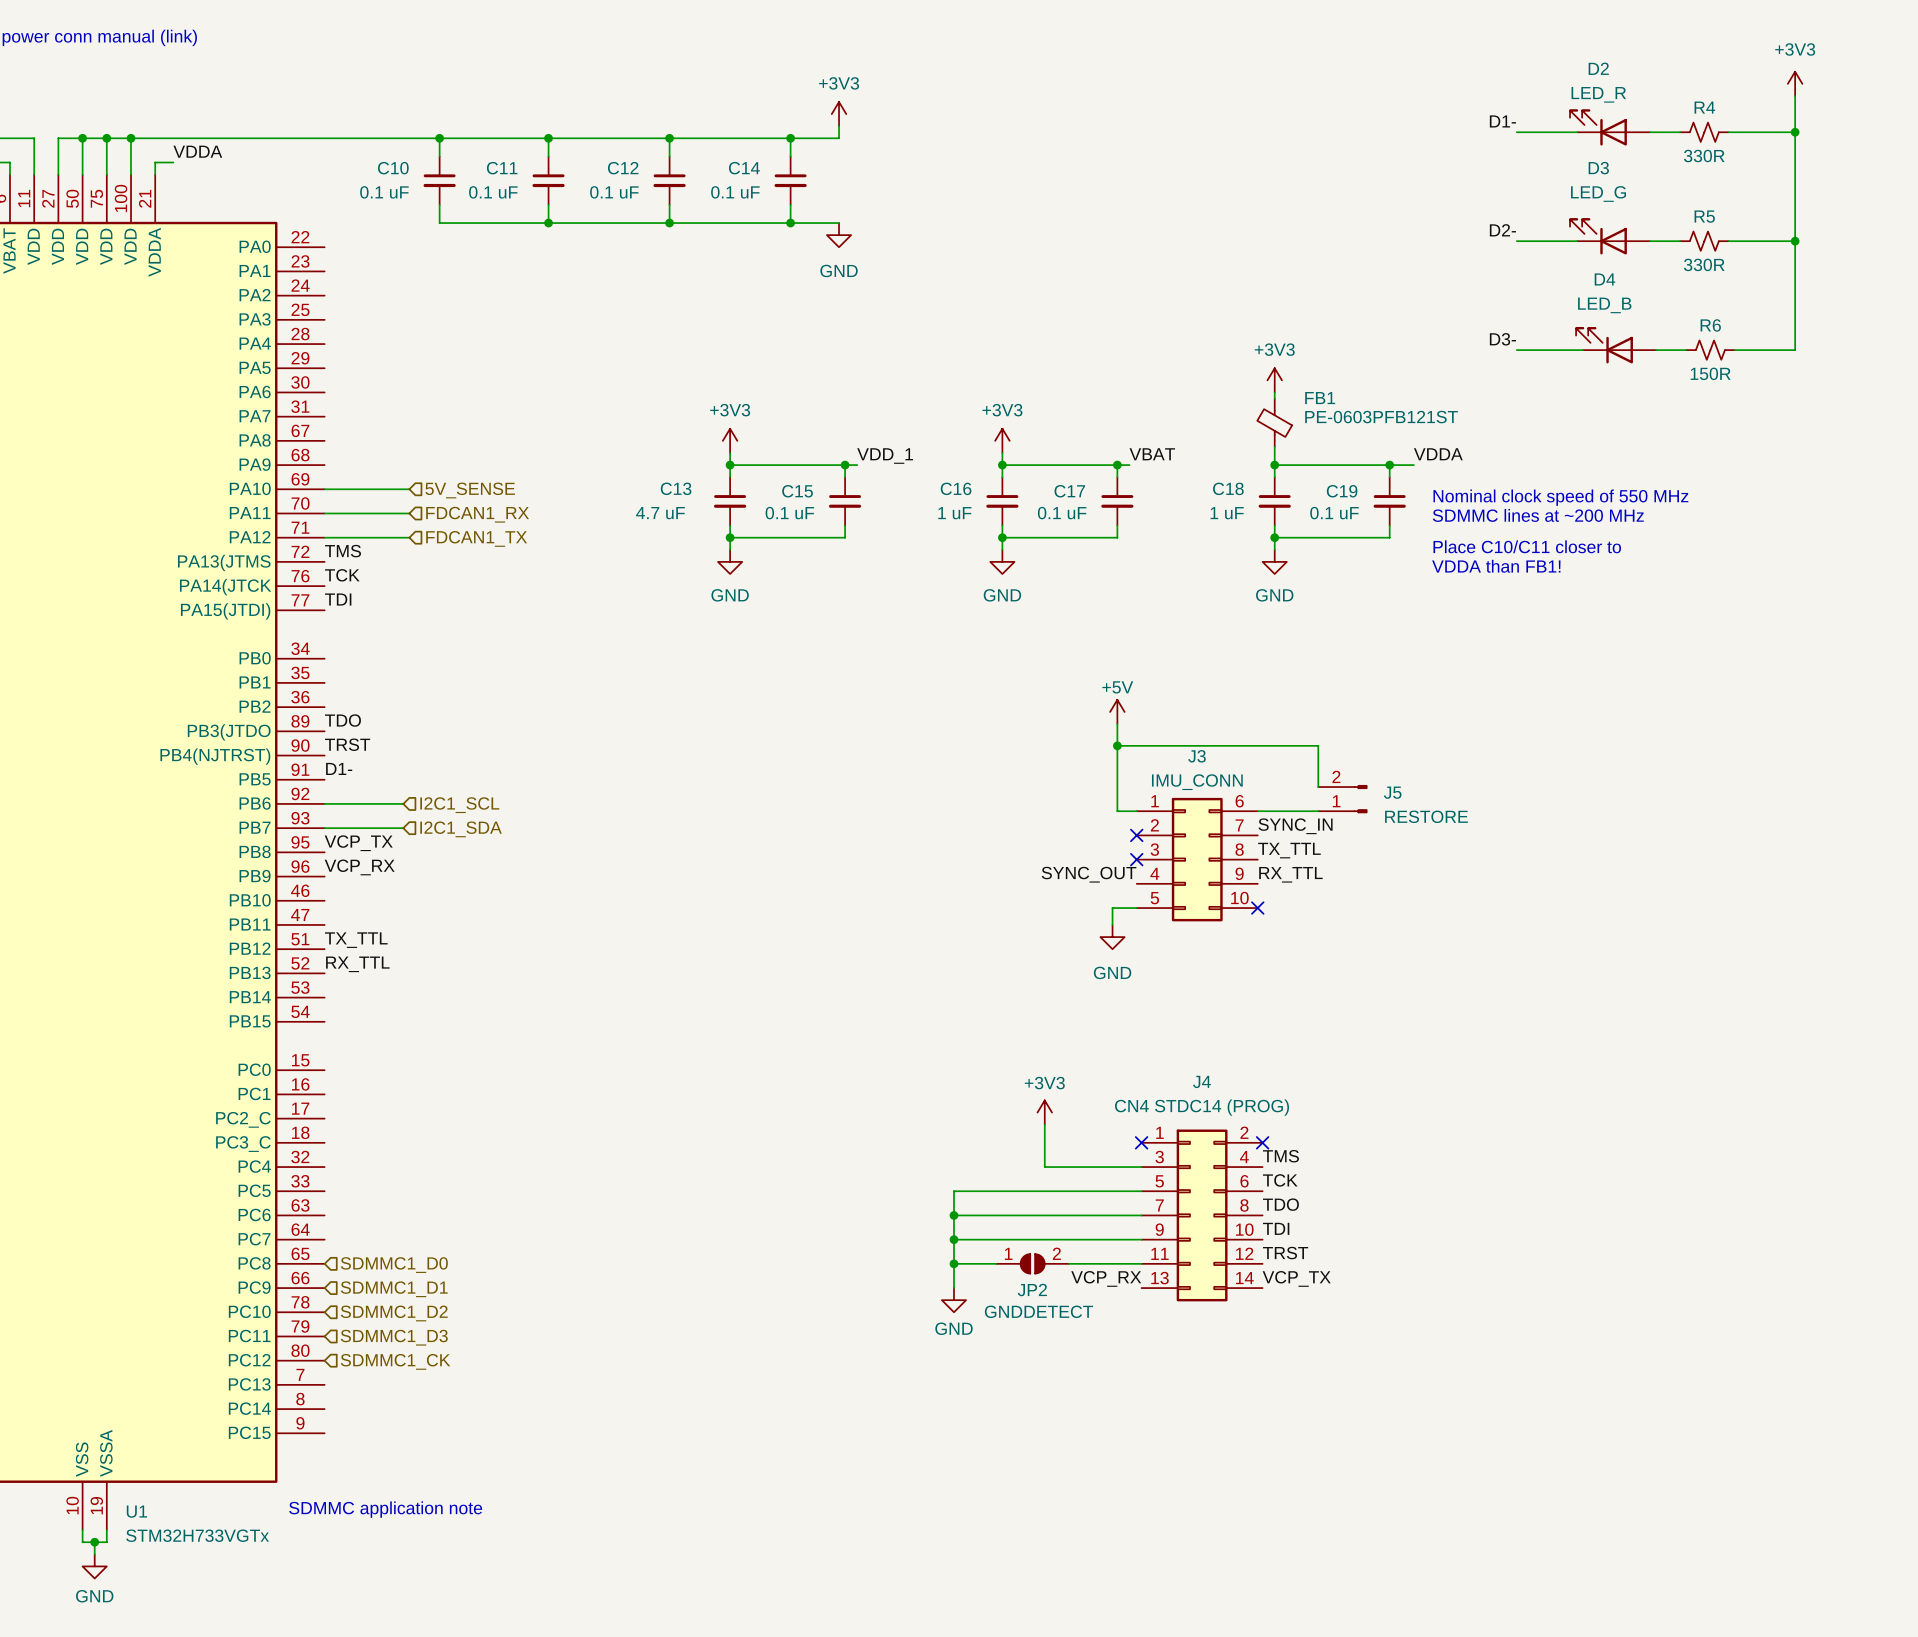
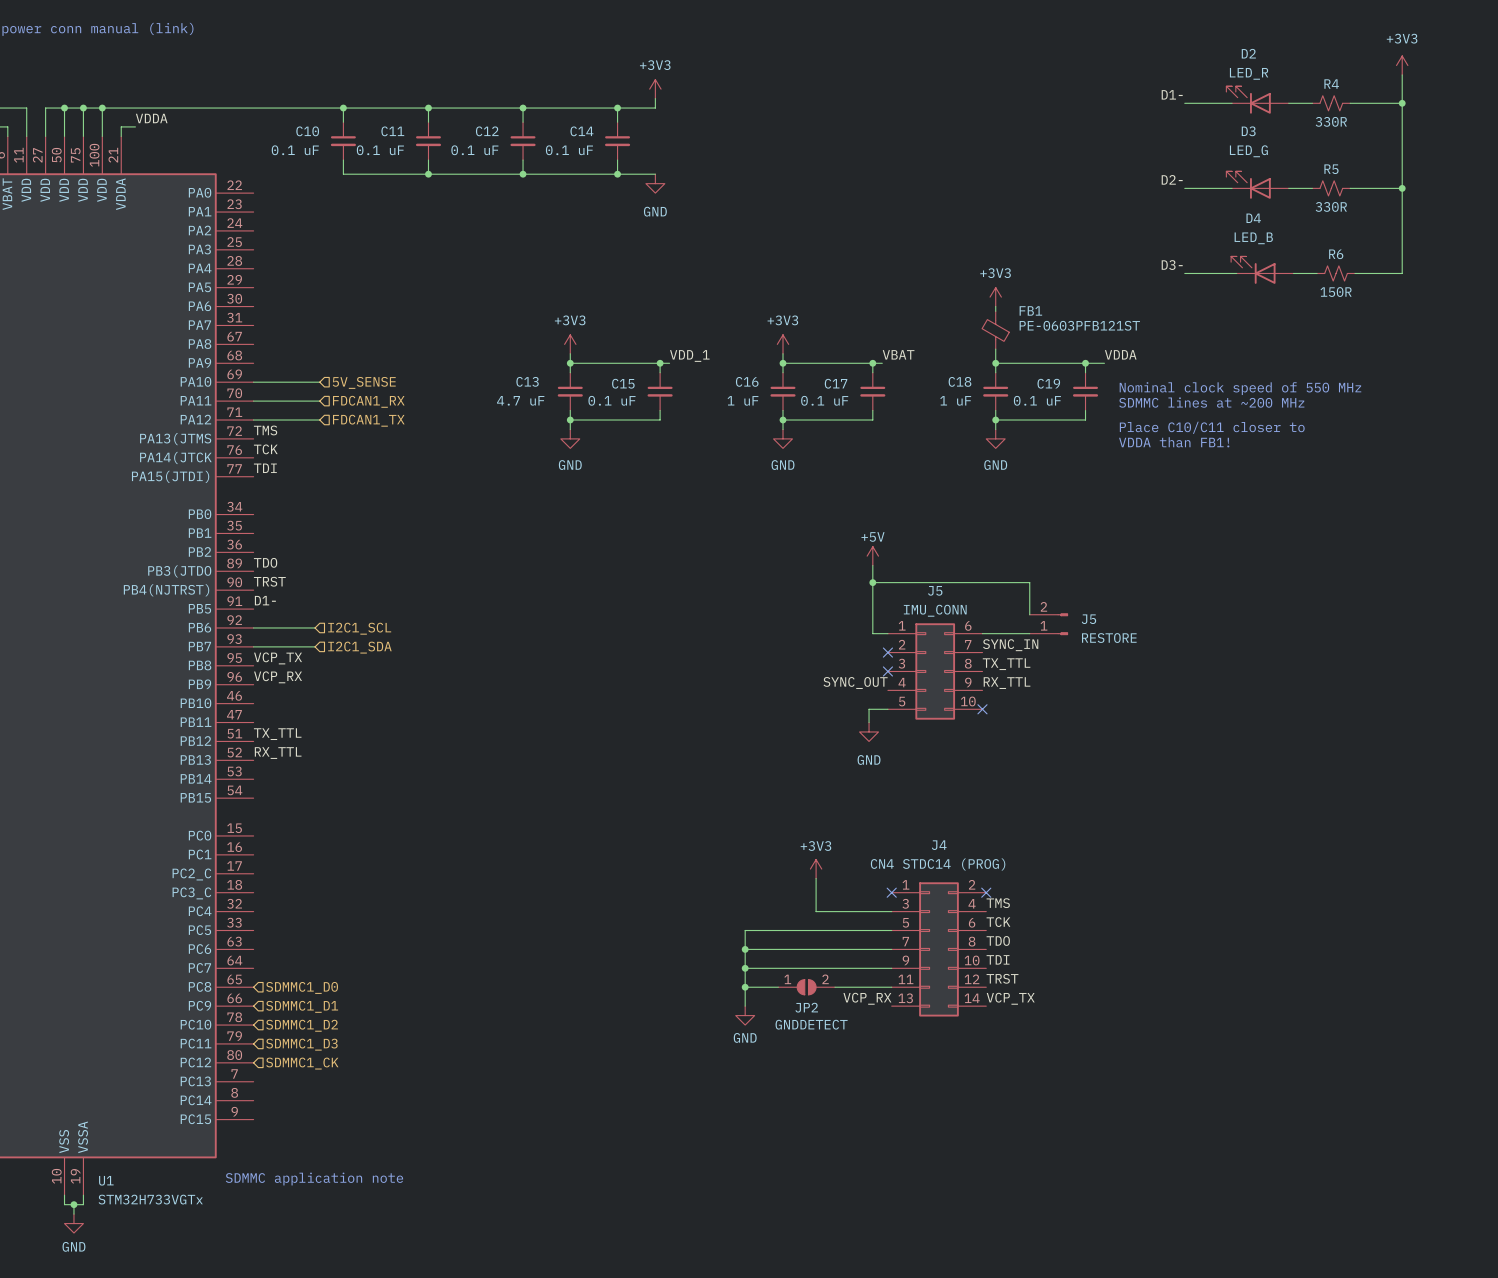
J3 name: J3 (1197, 756) -> J5 (935, 590)

